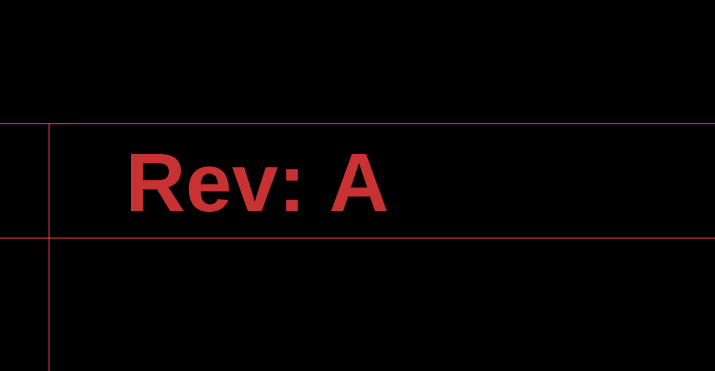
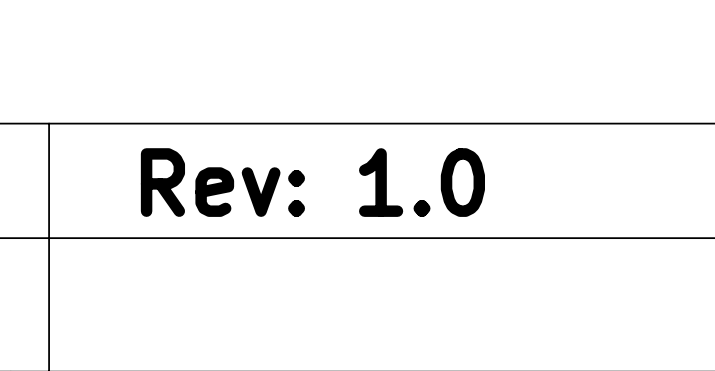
title block: Rev: A (258, 182) -> Rev: 1.0 (312, 182)

